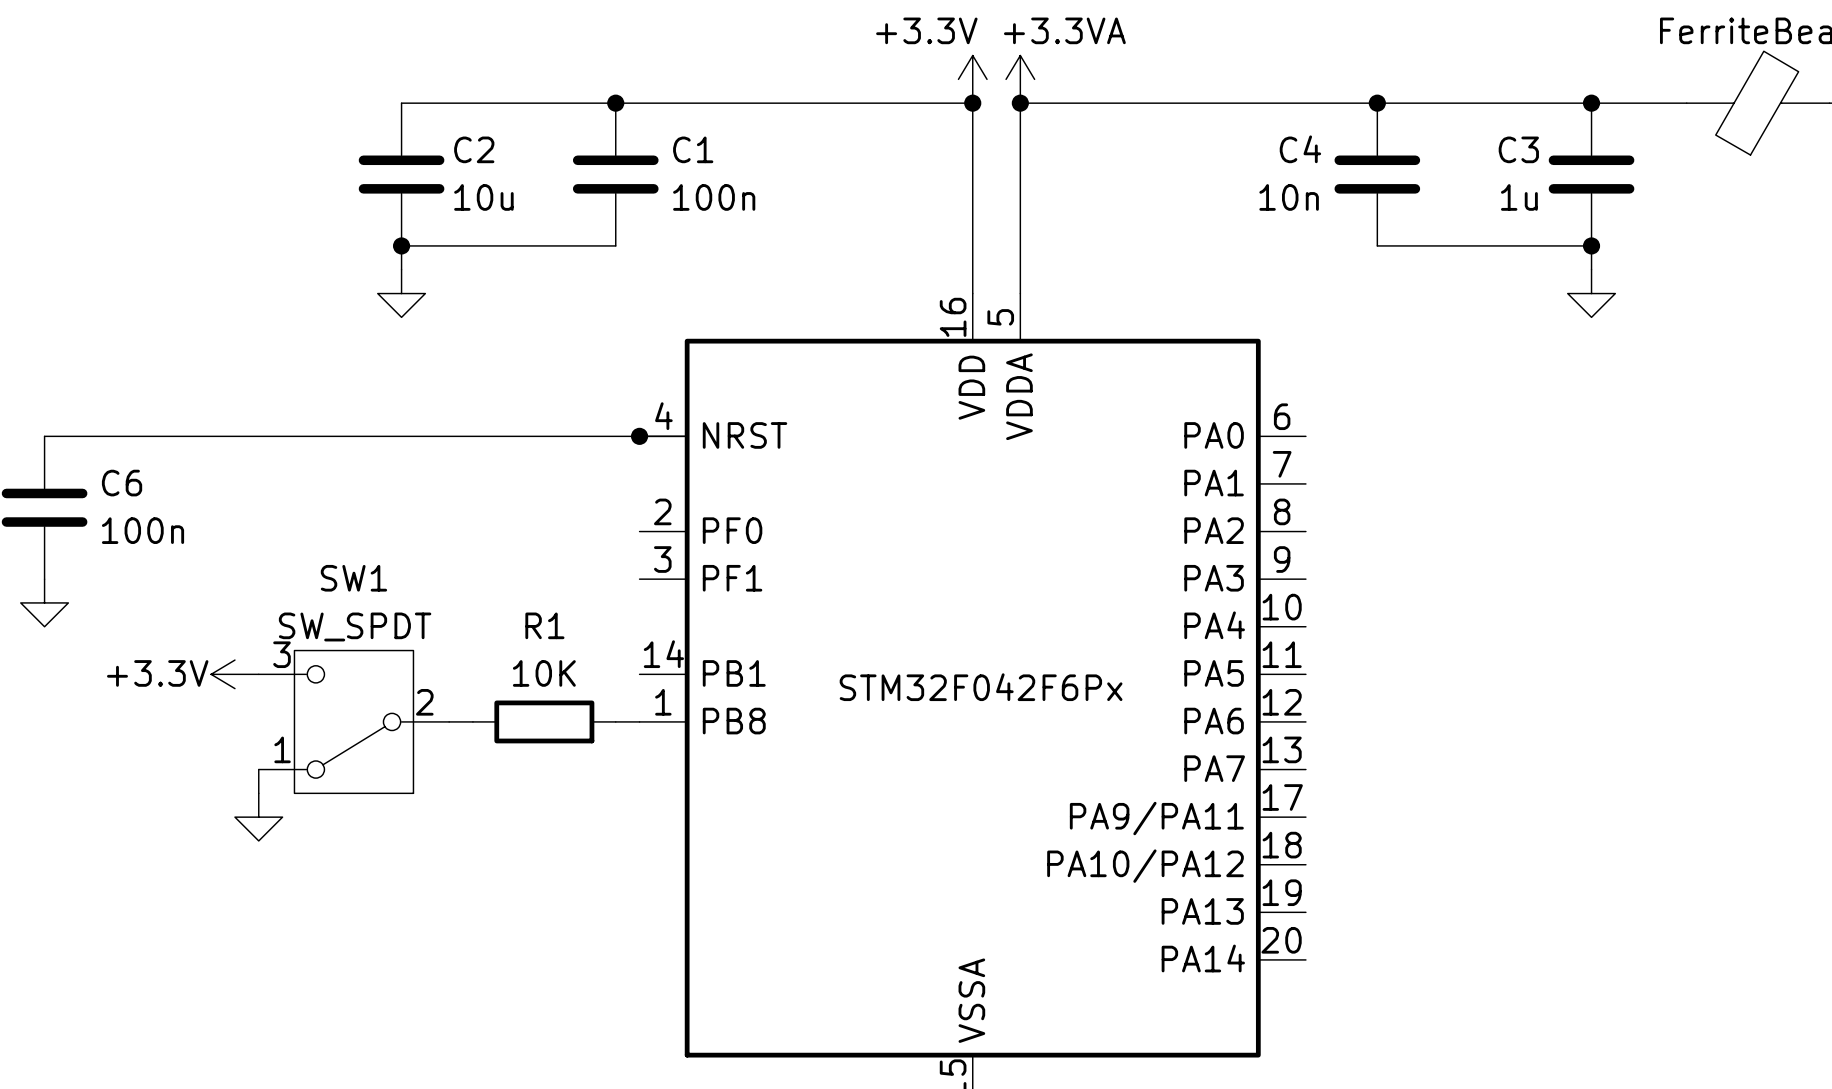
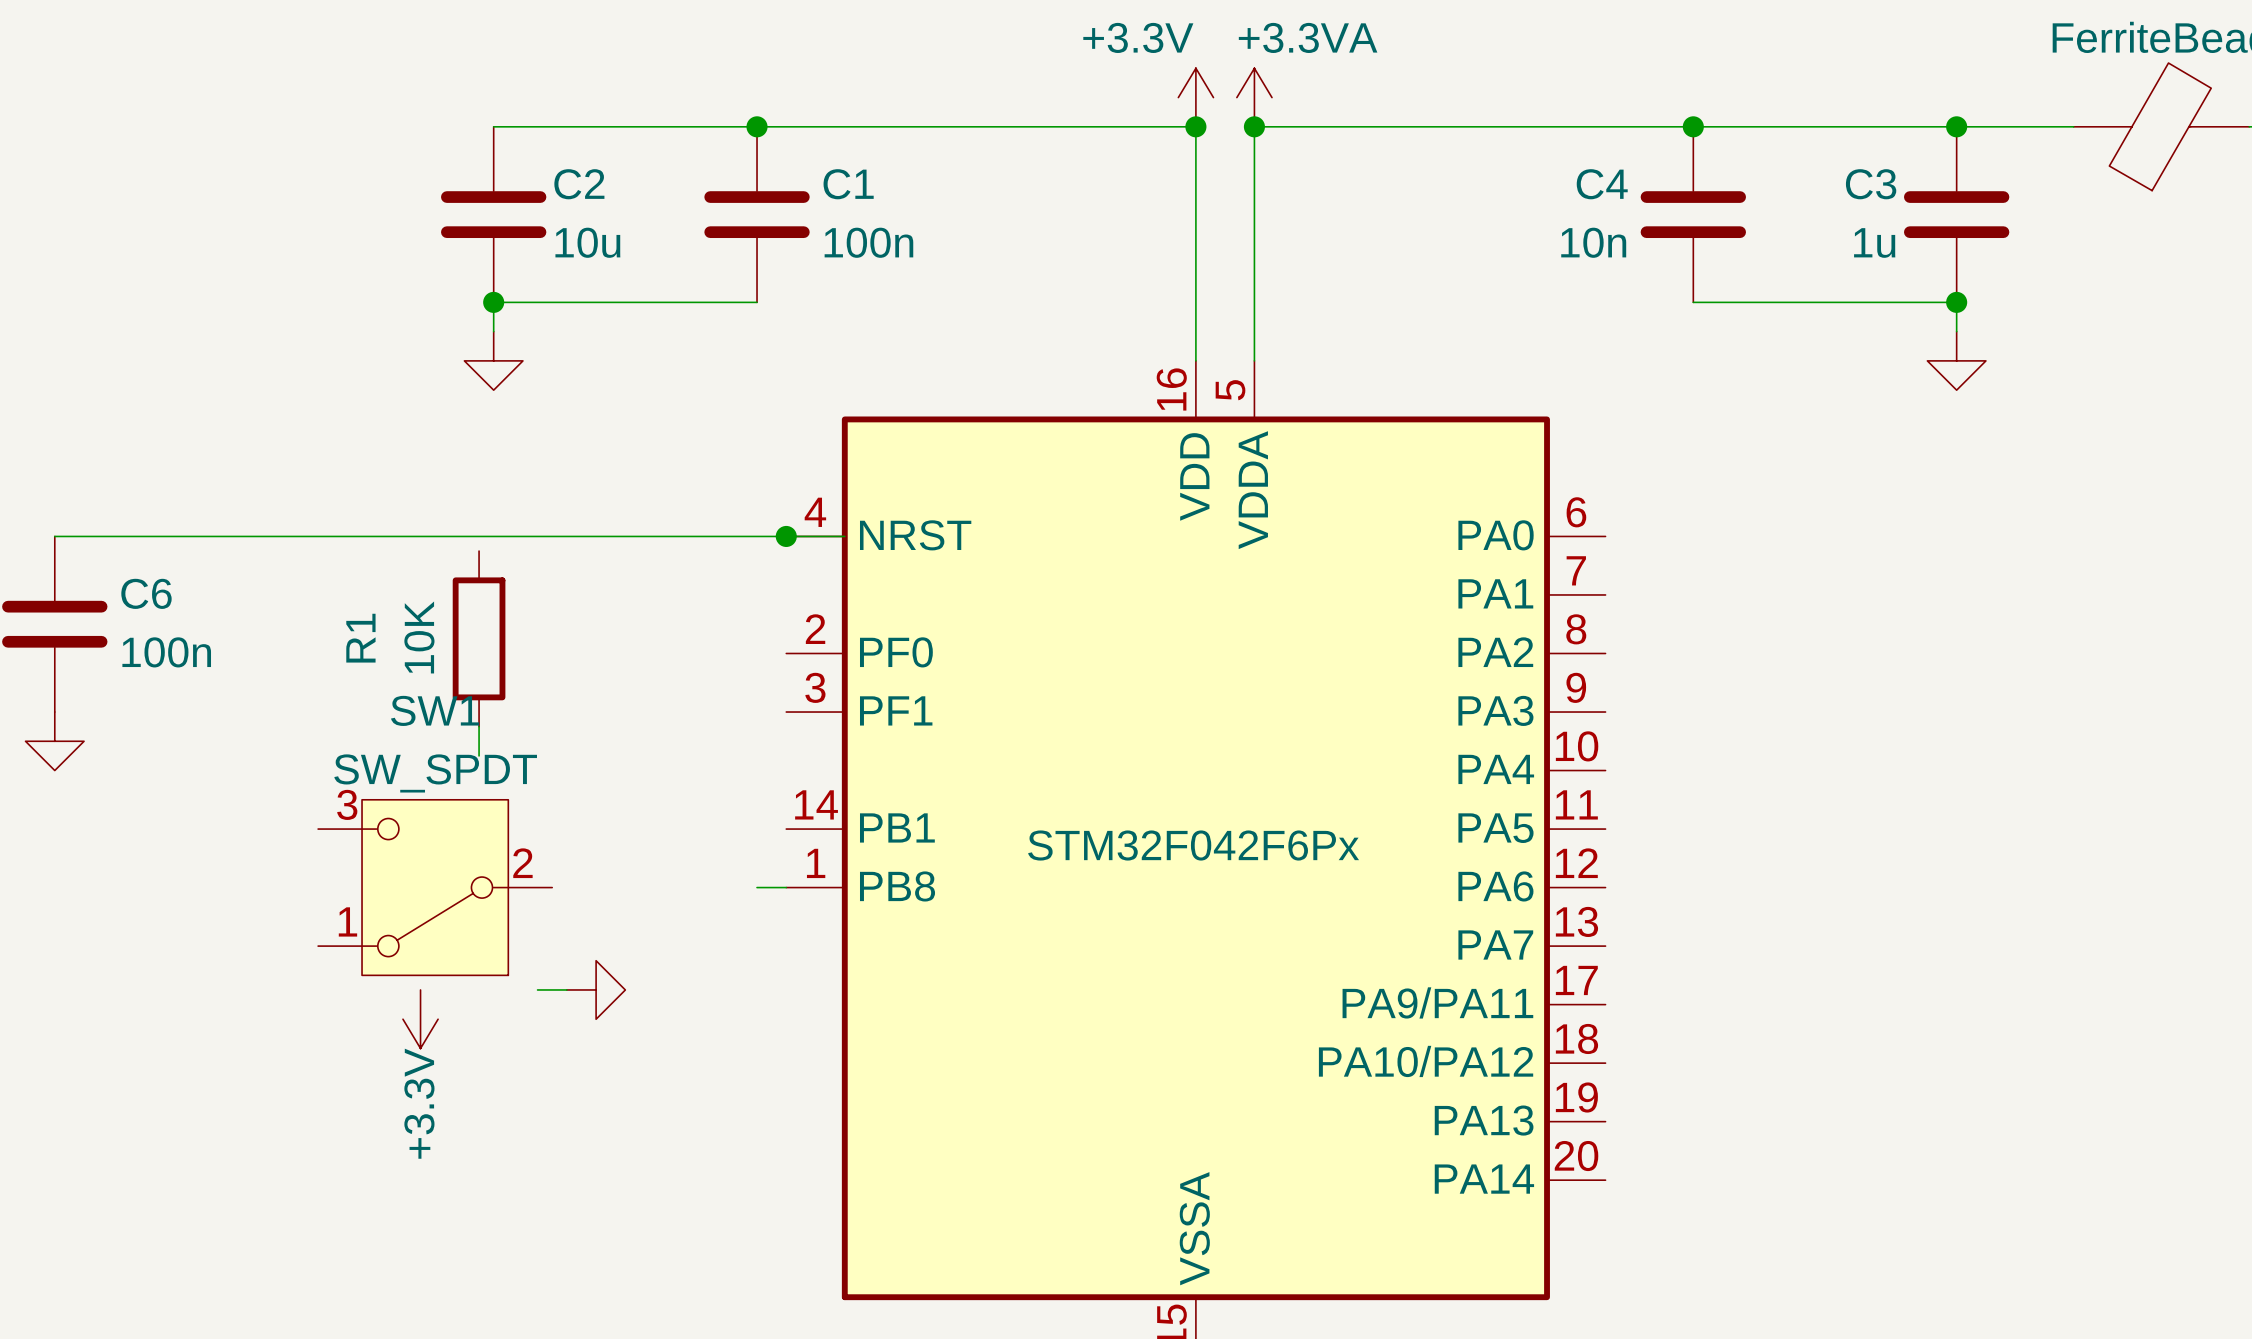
R1 name position: R1 (544, 625) -> R1 (360, 638)
R1 value position: 10K (544, 673) -> 10K (419, 637)
power symbol rotation: 0° (234, 674) -> 90° counterclockwise (420, 1019)
power symbol position: +3.3V (234, 674) -> +3.3V (420, 1019)
wire: (449, 721) (472, 721) -> (537, 989) (566, 989)
R1 rotation: 0° (544, 721) -> 90° clockwise (479, 638)
R1 position: (544, 721) -> (479, 638)
wire: (258, 769) (258, 793) -> (479, 726) (479, 755)
power symbol rotation: 0° (258, 817) -> 90° counterclockwise (596, 989)
power symbol position: (258, 817) -> (596, 989)

